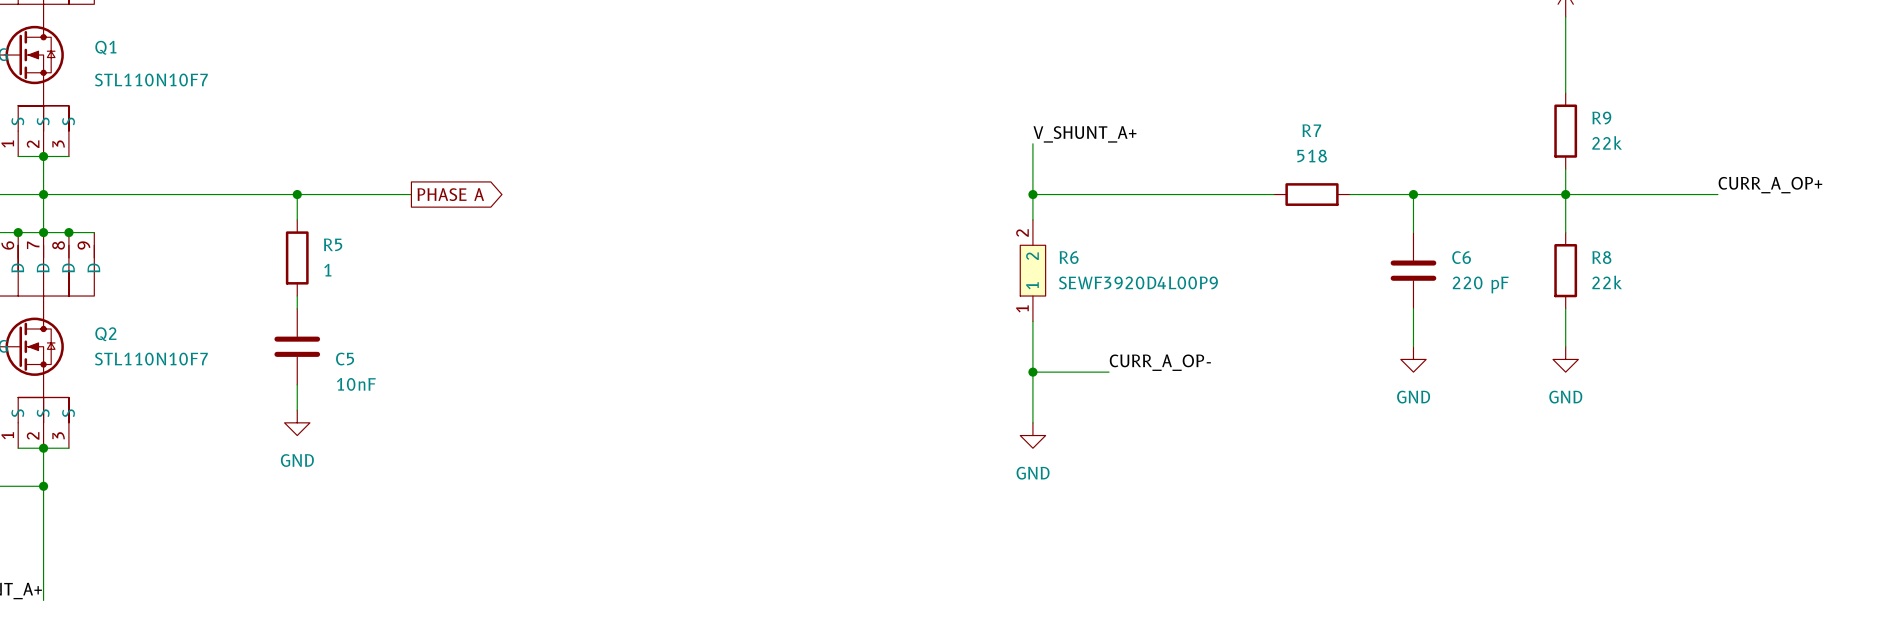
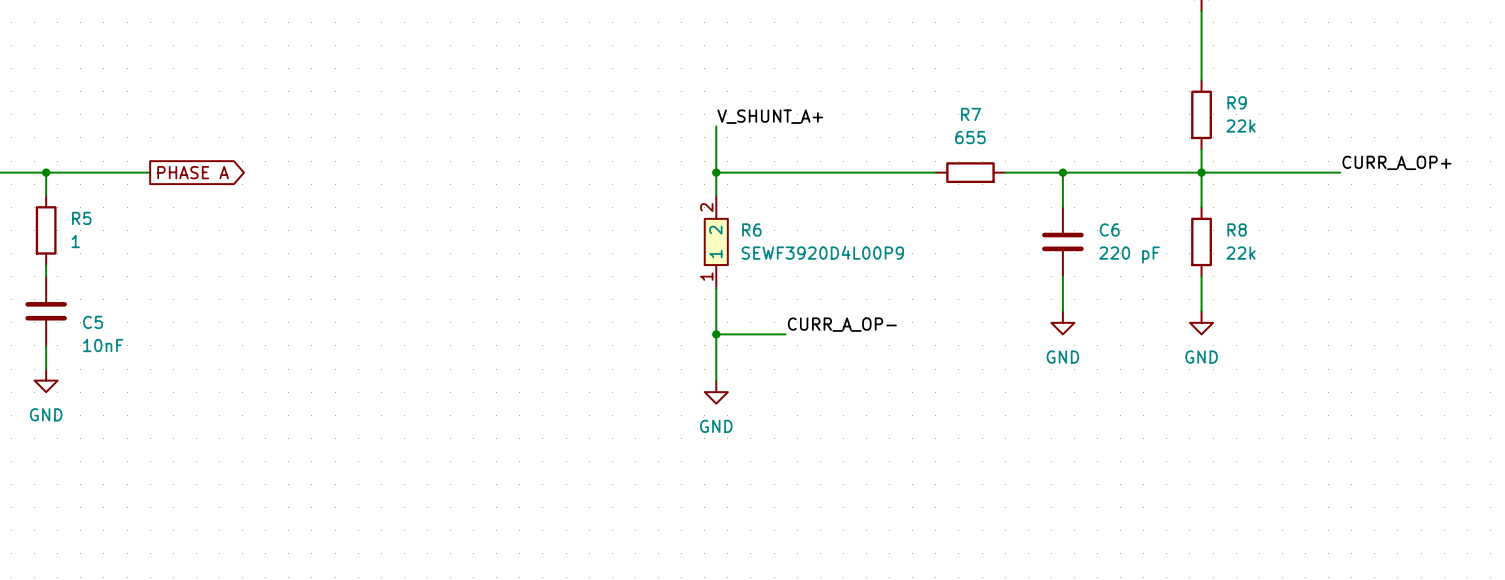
R7 value: 518 (1312, 156) -> 655 (970, 137)

